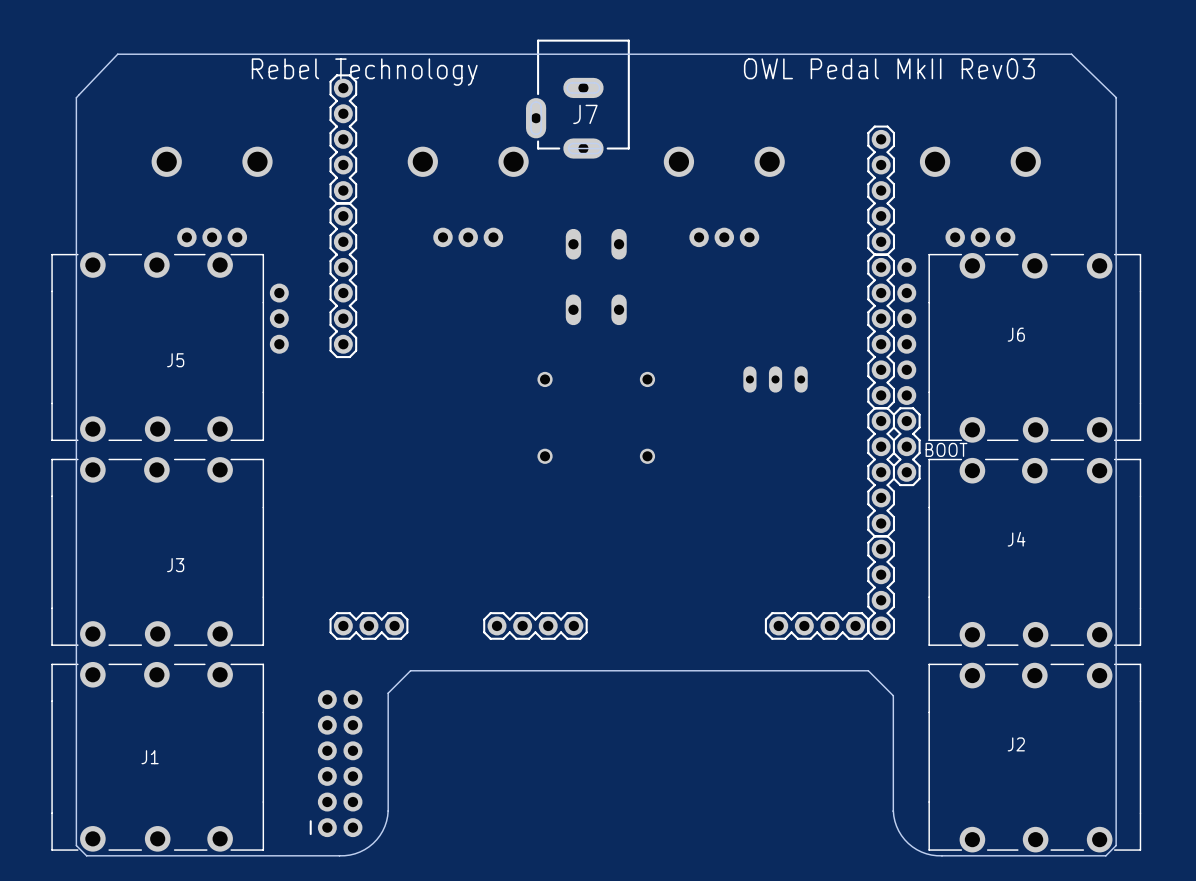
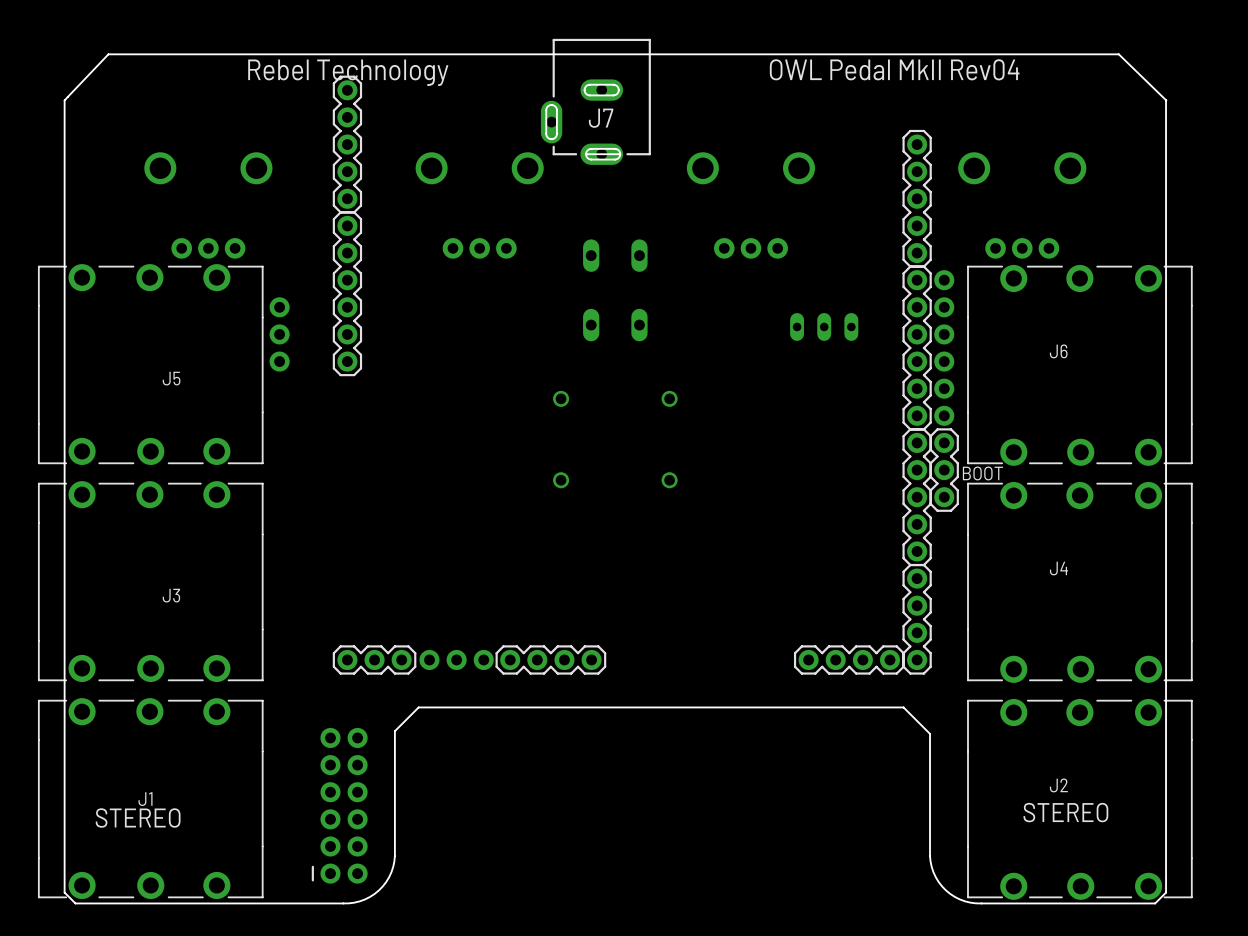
text: OWL Pedal MkII Rev03 (889, 68) -> OWL Pedal MkII Rev04 (894, 69)
part position: (775, 379) -> (824, 326)
part: none -> (456, 659)
text: none -> STEREO (1065, 812)
text: none -> STEREO (138, 818)

